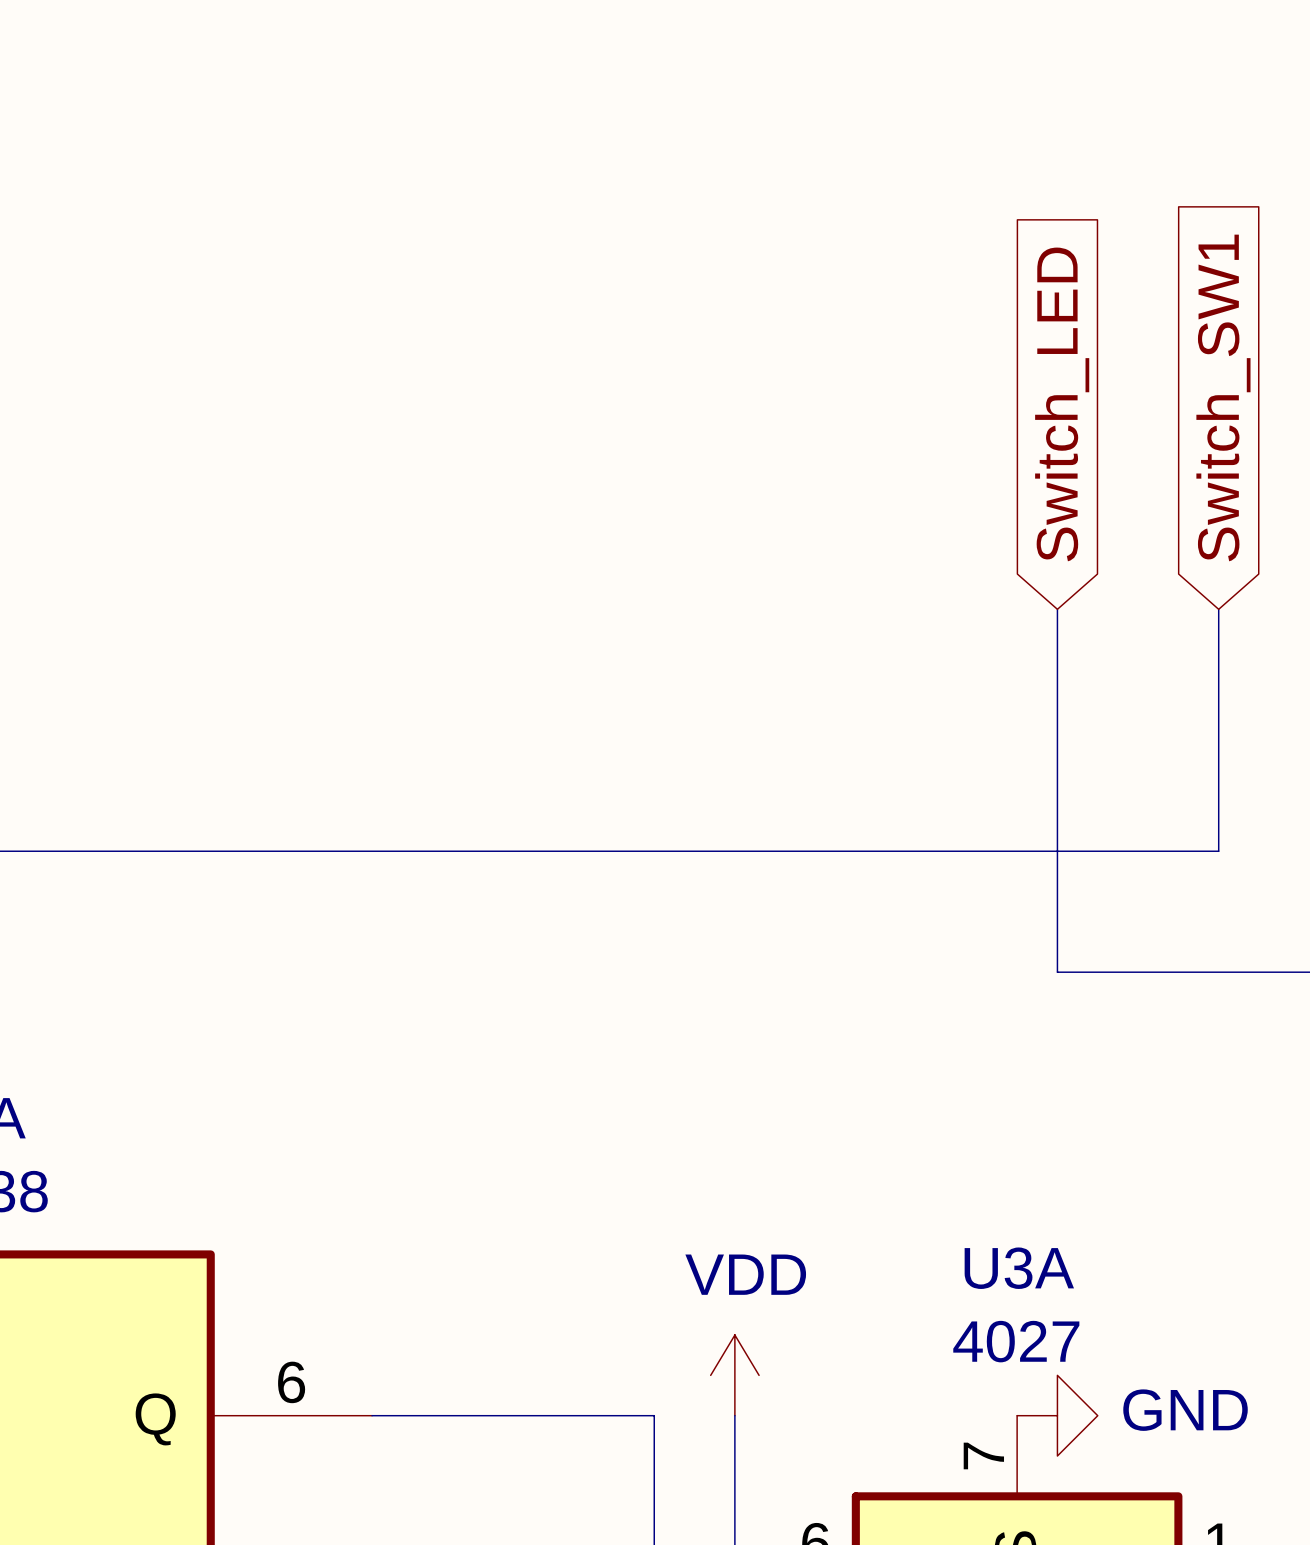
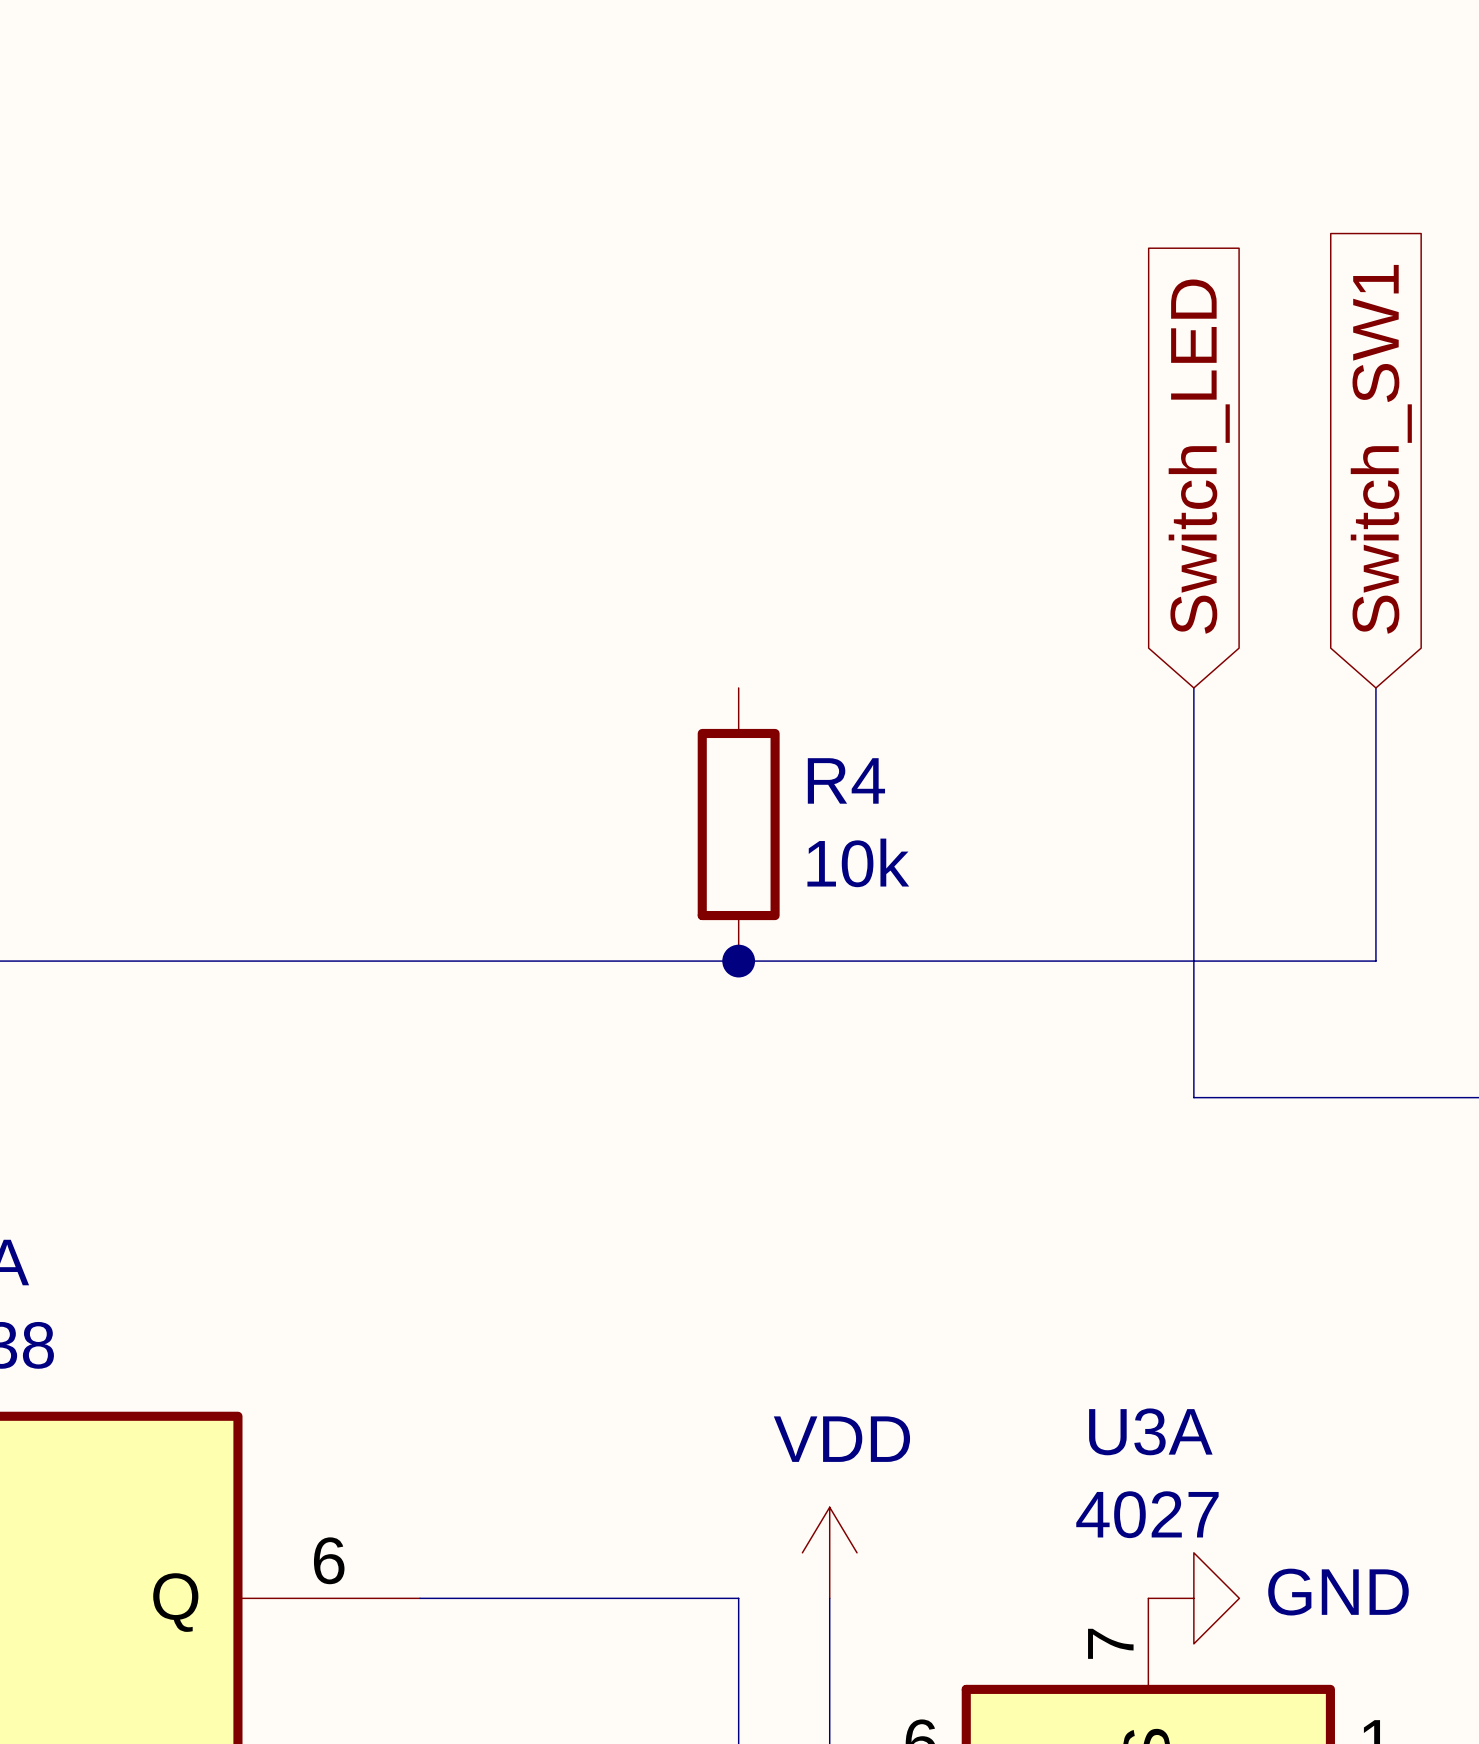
R4: none -> 10k (738, 824)
junction: none -> (738, 961)

